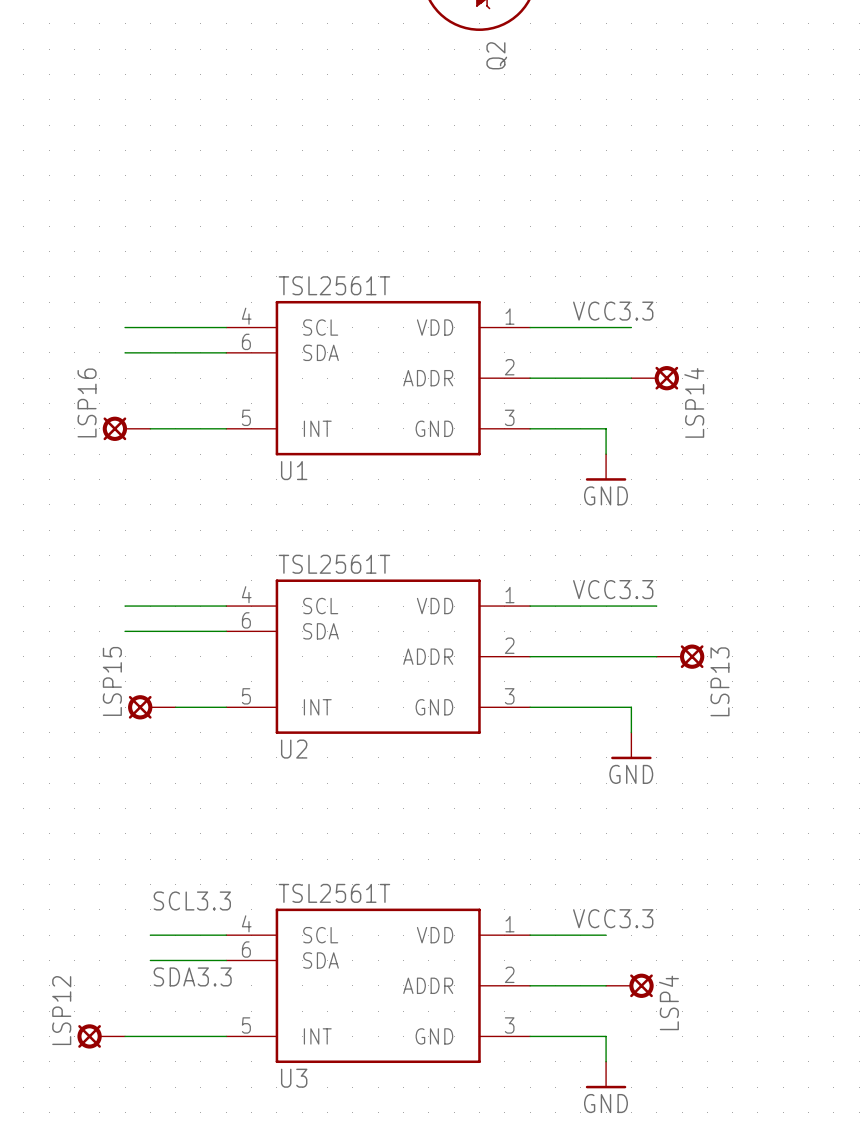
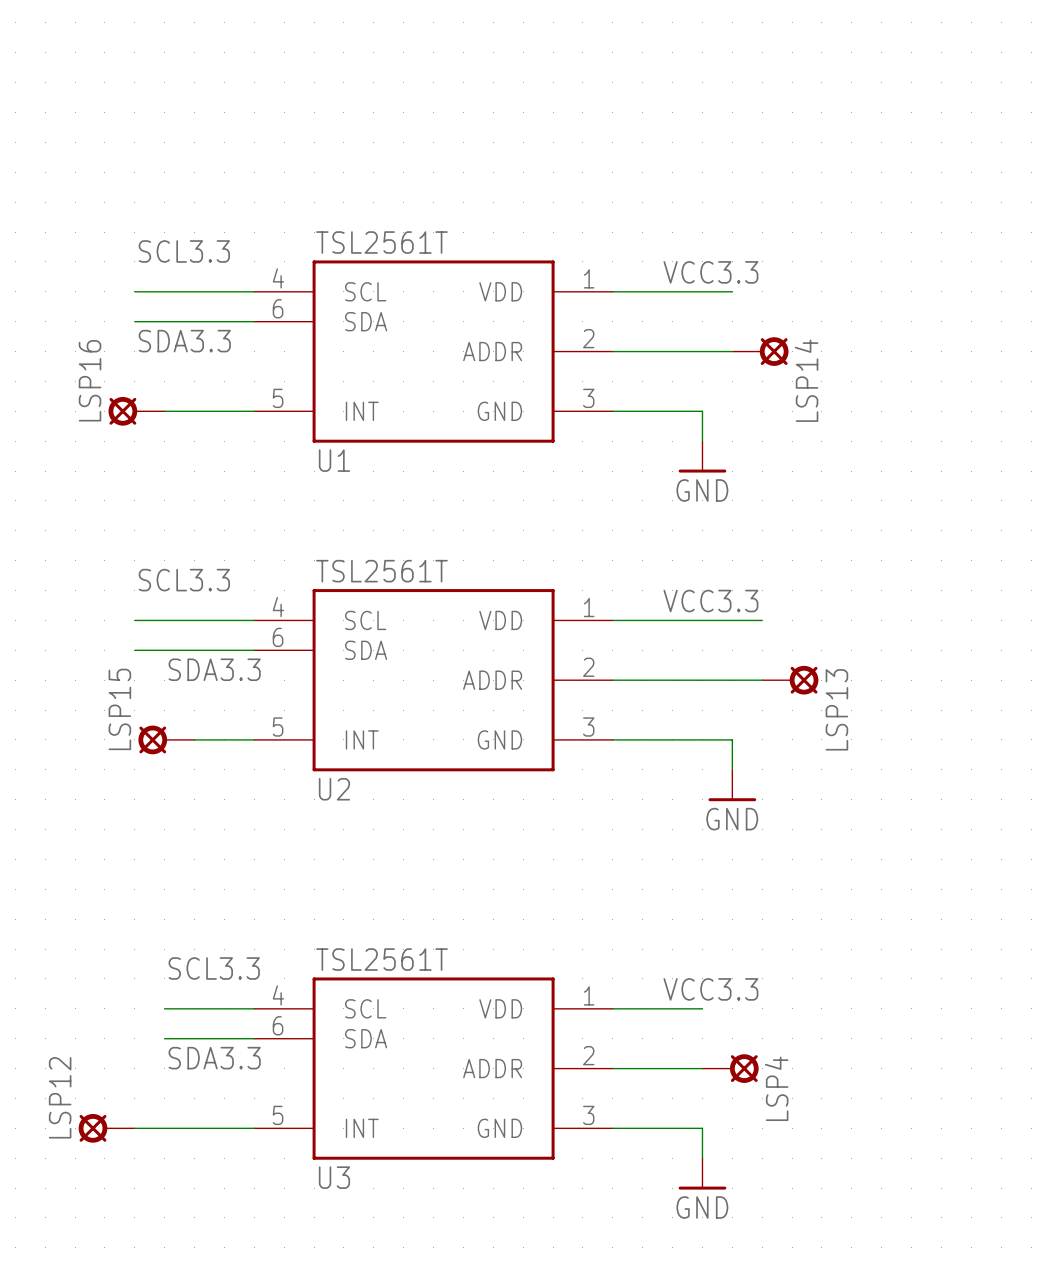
text: none -> SCL3.3 (184, 251)
text: none -> SDA3.3 (184, 341)
text: none -> SCL3.3 (184, 580)
text: none -> SDA3.3 (214, 669)

